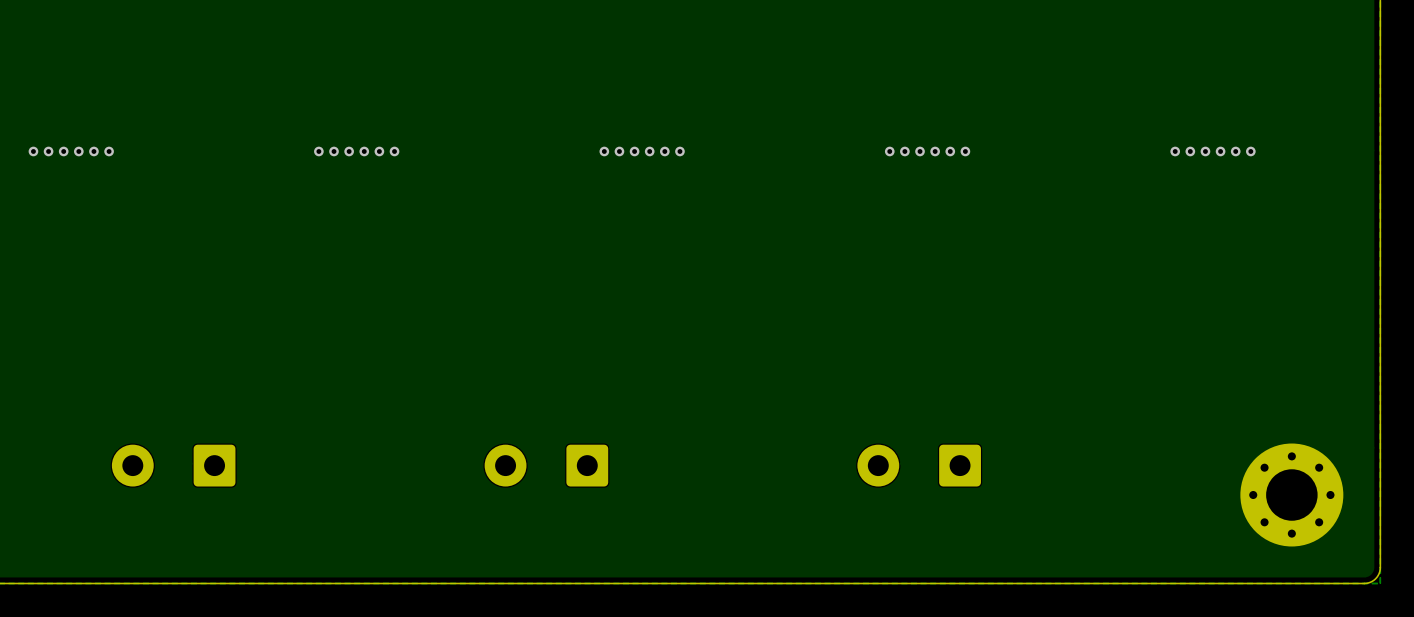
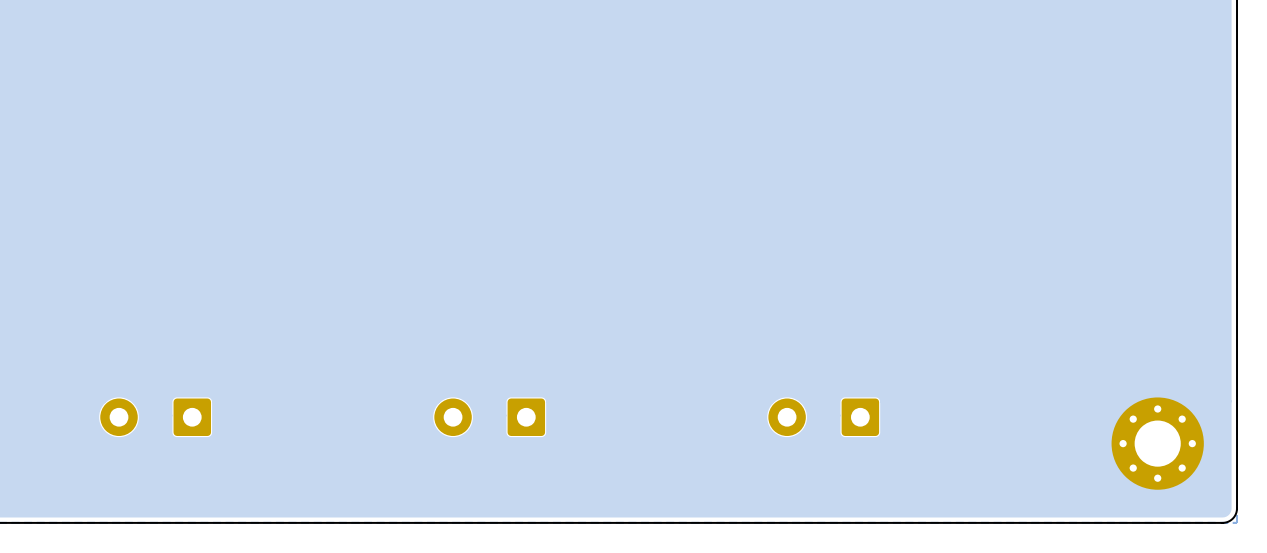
via: (33, 151) -> none
via: (48, 151) -> none
via: (63, 151) -> none
via: (78, 151) -> none
via: (93, 151) -> none
via: (109, 151) -> none
via: (318, 151) -> none
via: (334, 151) -> none
via: (349, 151) -> none
via: (364, 151) -> none
via: (379, 151) -> none
via: (394, 151) -> none
via: (604, 151) -> none
via: (619, 151) -> none
via: (634, 151) -> none
via: (649, 151) -> none
via: (664, 151) -> none
via: (679, 151) -> none
via: (889, 151) -> none
via: (904, 151) -> none
via: (920, 151) -> none
via: (935, 151) -> none
via: (950, 151) -> none
via: (965, 151) -> none
via: (1175, 151) -> none
via: (1190, 151) -> none
via: (1205, 151) -> none
via: (1220, 151) -> none
via: (1235, 151) -> none
via: (1250, 151) -> none

